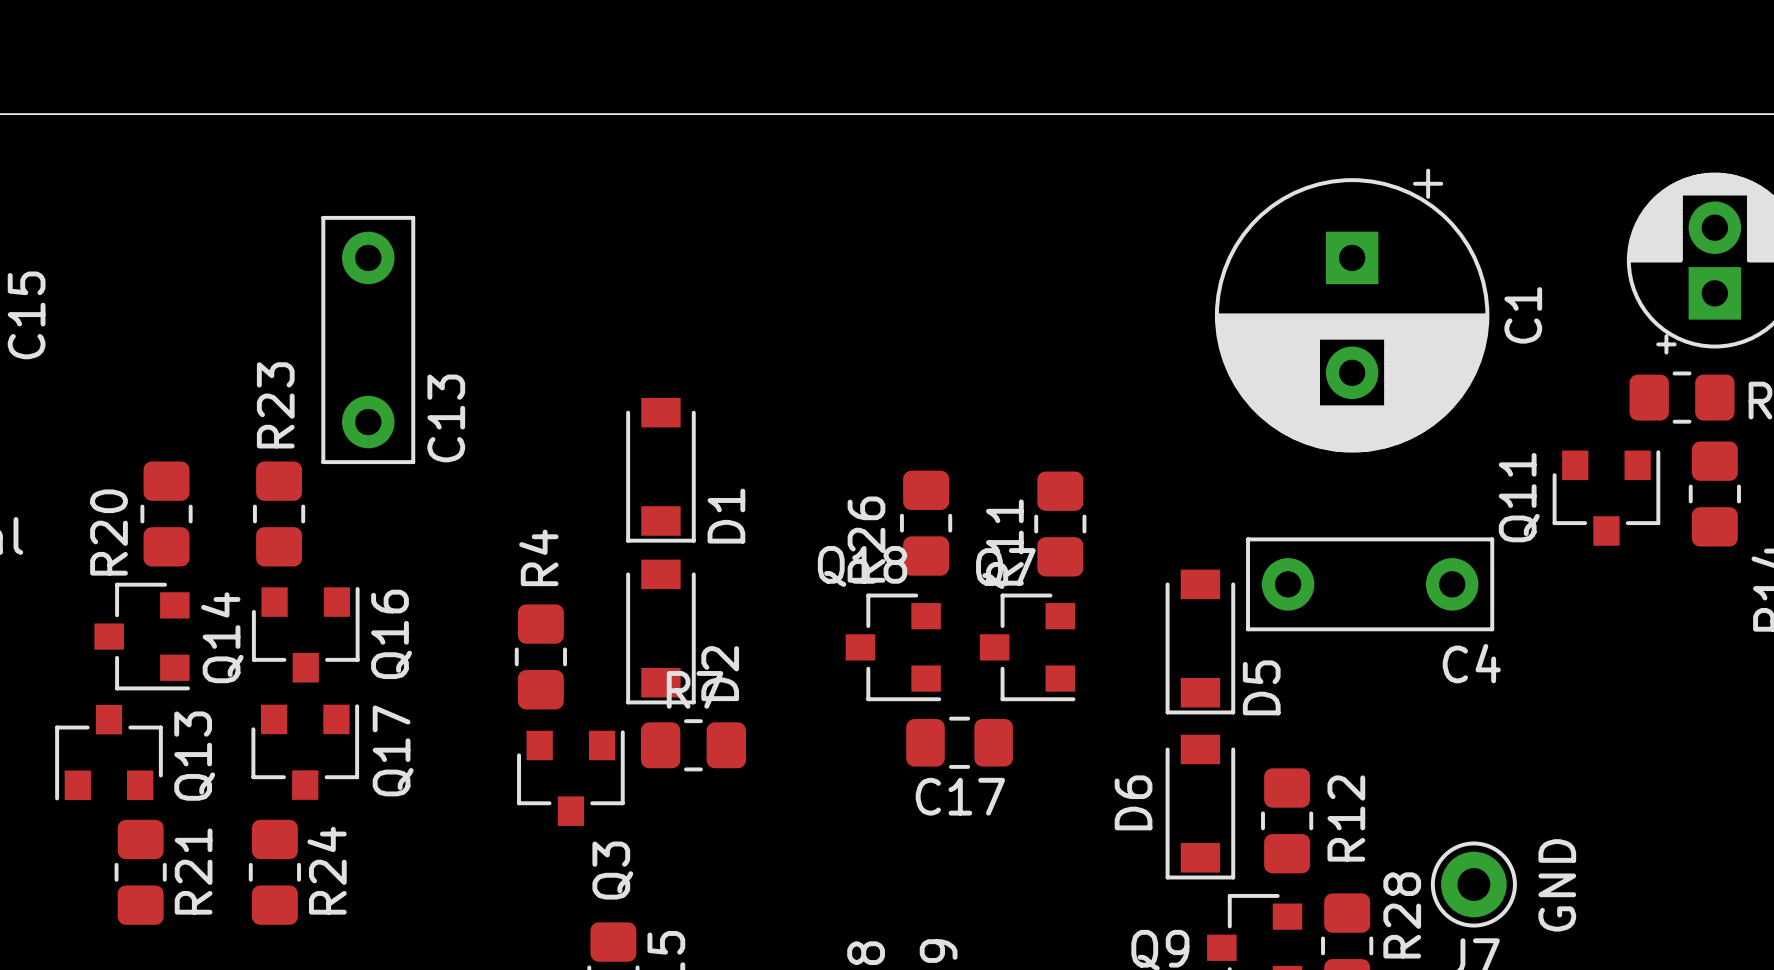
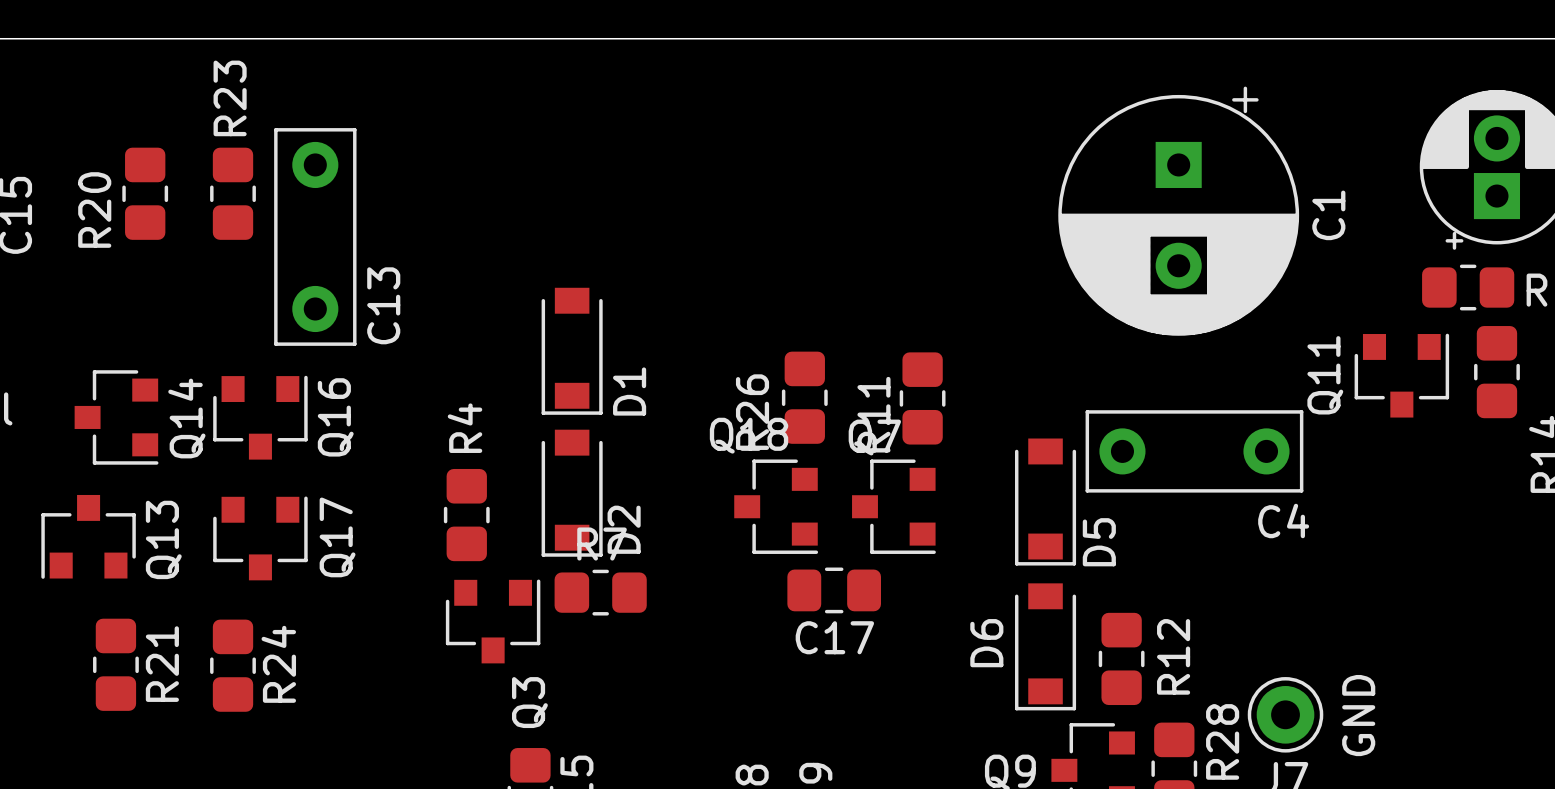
R20 position: (166, 514) -> (145, 193)
R23 position: (279, 514) -> (233, 193)
Q16 position: (305, 634) -> (260, 417)
Q14 position: (142, 636) -> (116, 417)
Q13 position: (108, 752) -> (88, 536)
Q17 position: (305, 752) -> (260, 538)
R21 position: (140, 872) -> (115, 664)
R24 position: (274, 872) -> (233, 665)

